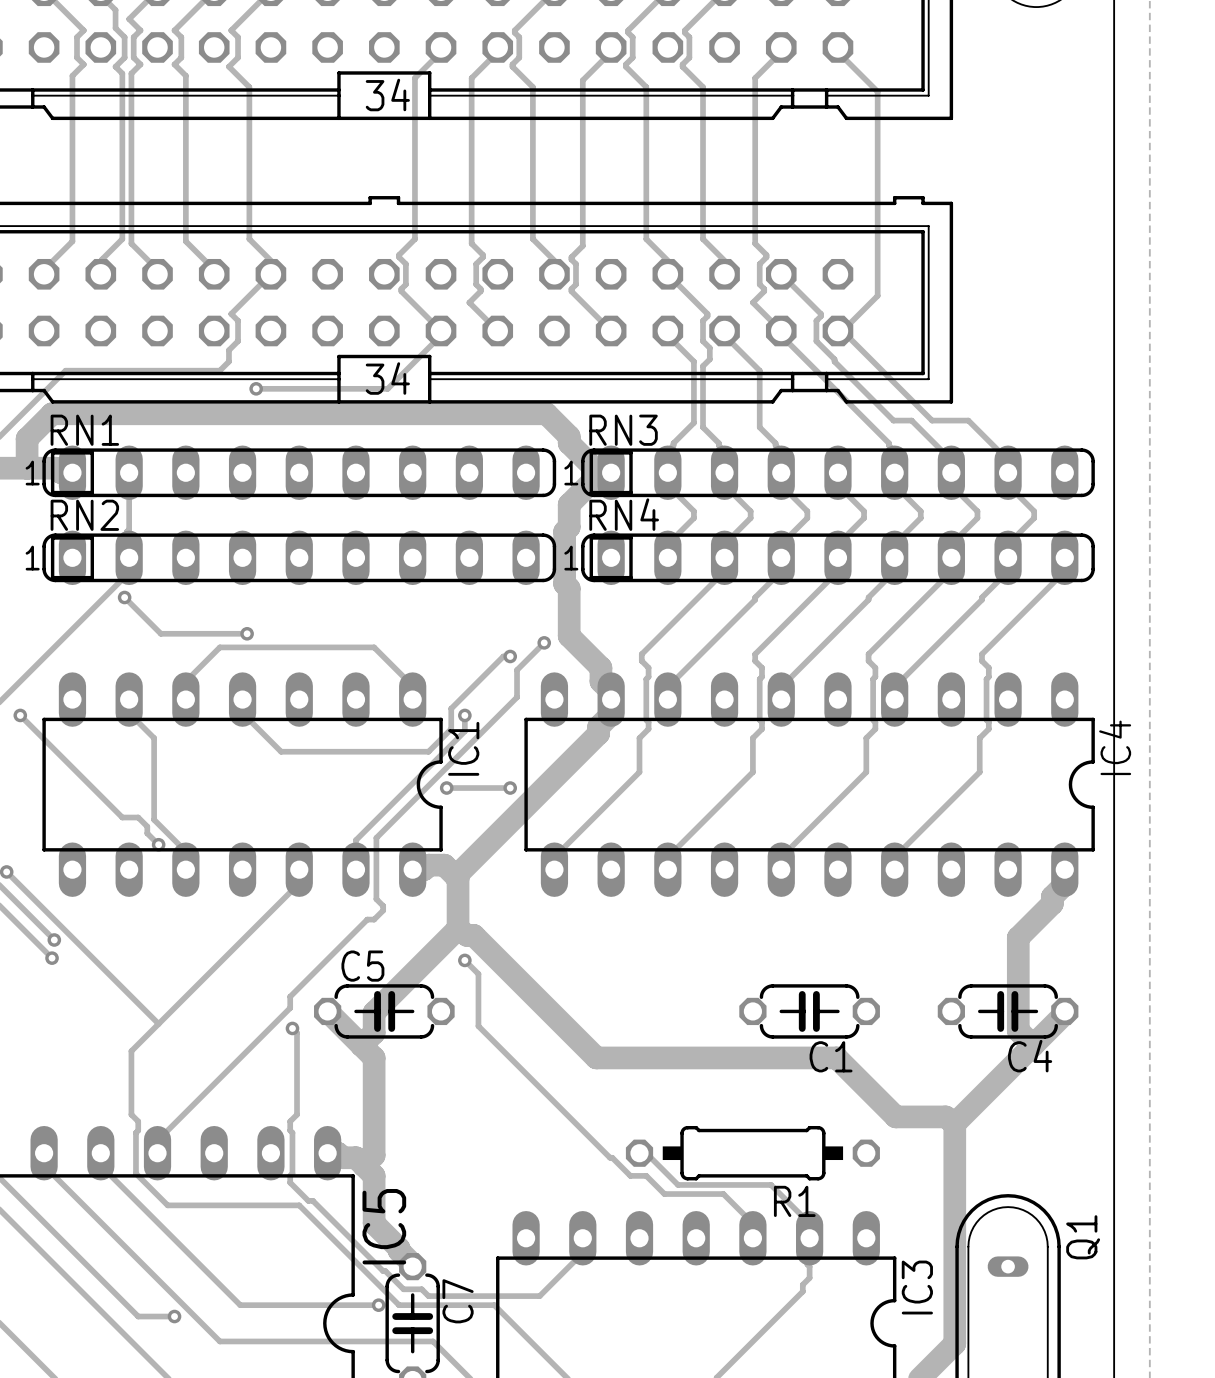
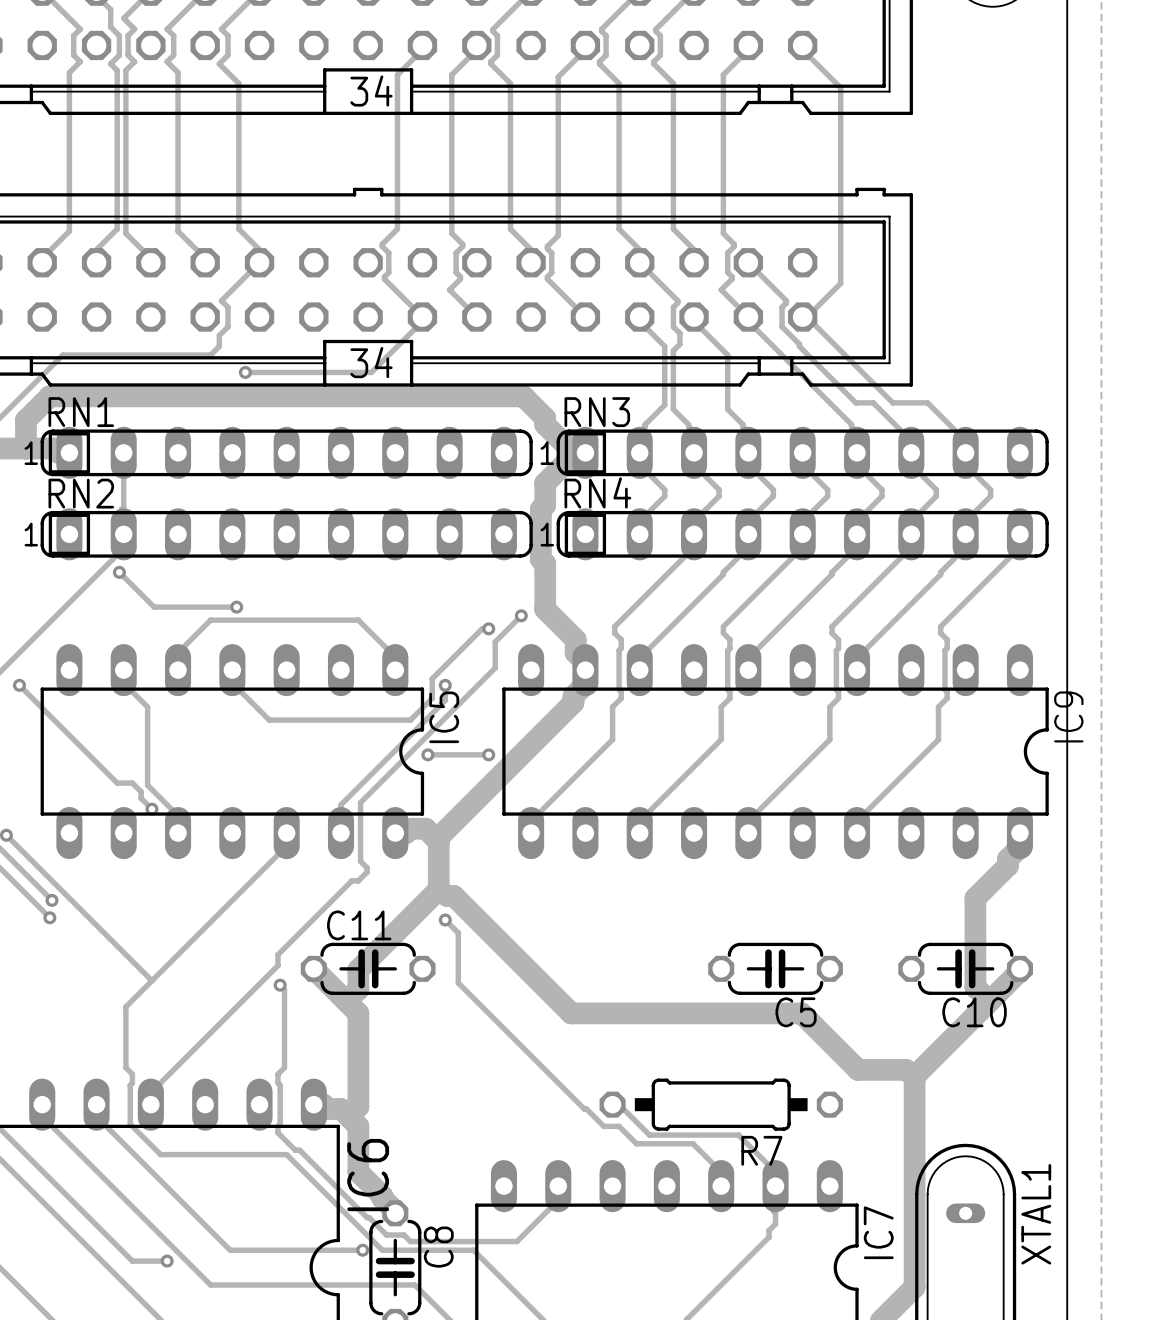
IC4 name: IC4 (1115, 747) -> IC9 (1068, 716)
IC1 name: IC1 (463, 748) -> IC5 (444, 717)
C5 name: C5 (362, 966) -> C11 (359, 925)
C1 name: C1 (831, 1056) -> C5 (796, 1012)
C4 name: C4 (1030, 1056) -> C10 (974, 1012)
R1 name: R1 (794, 1201) -> R7 (761, 1150)
IC5 name: IC5 (384, 1226) -> IC6 (368, 1175)
Q1 name: Q1 (1083, 1237) -> XTAL1 (1036, 1214)
IC3 name: IC3 (917, 1287) -> IC7 (878, 1232)
C7 name: C7 (458, 1301) -> C8 (438, 1247)

